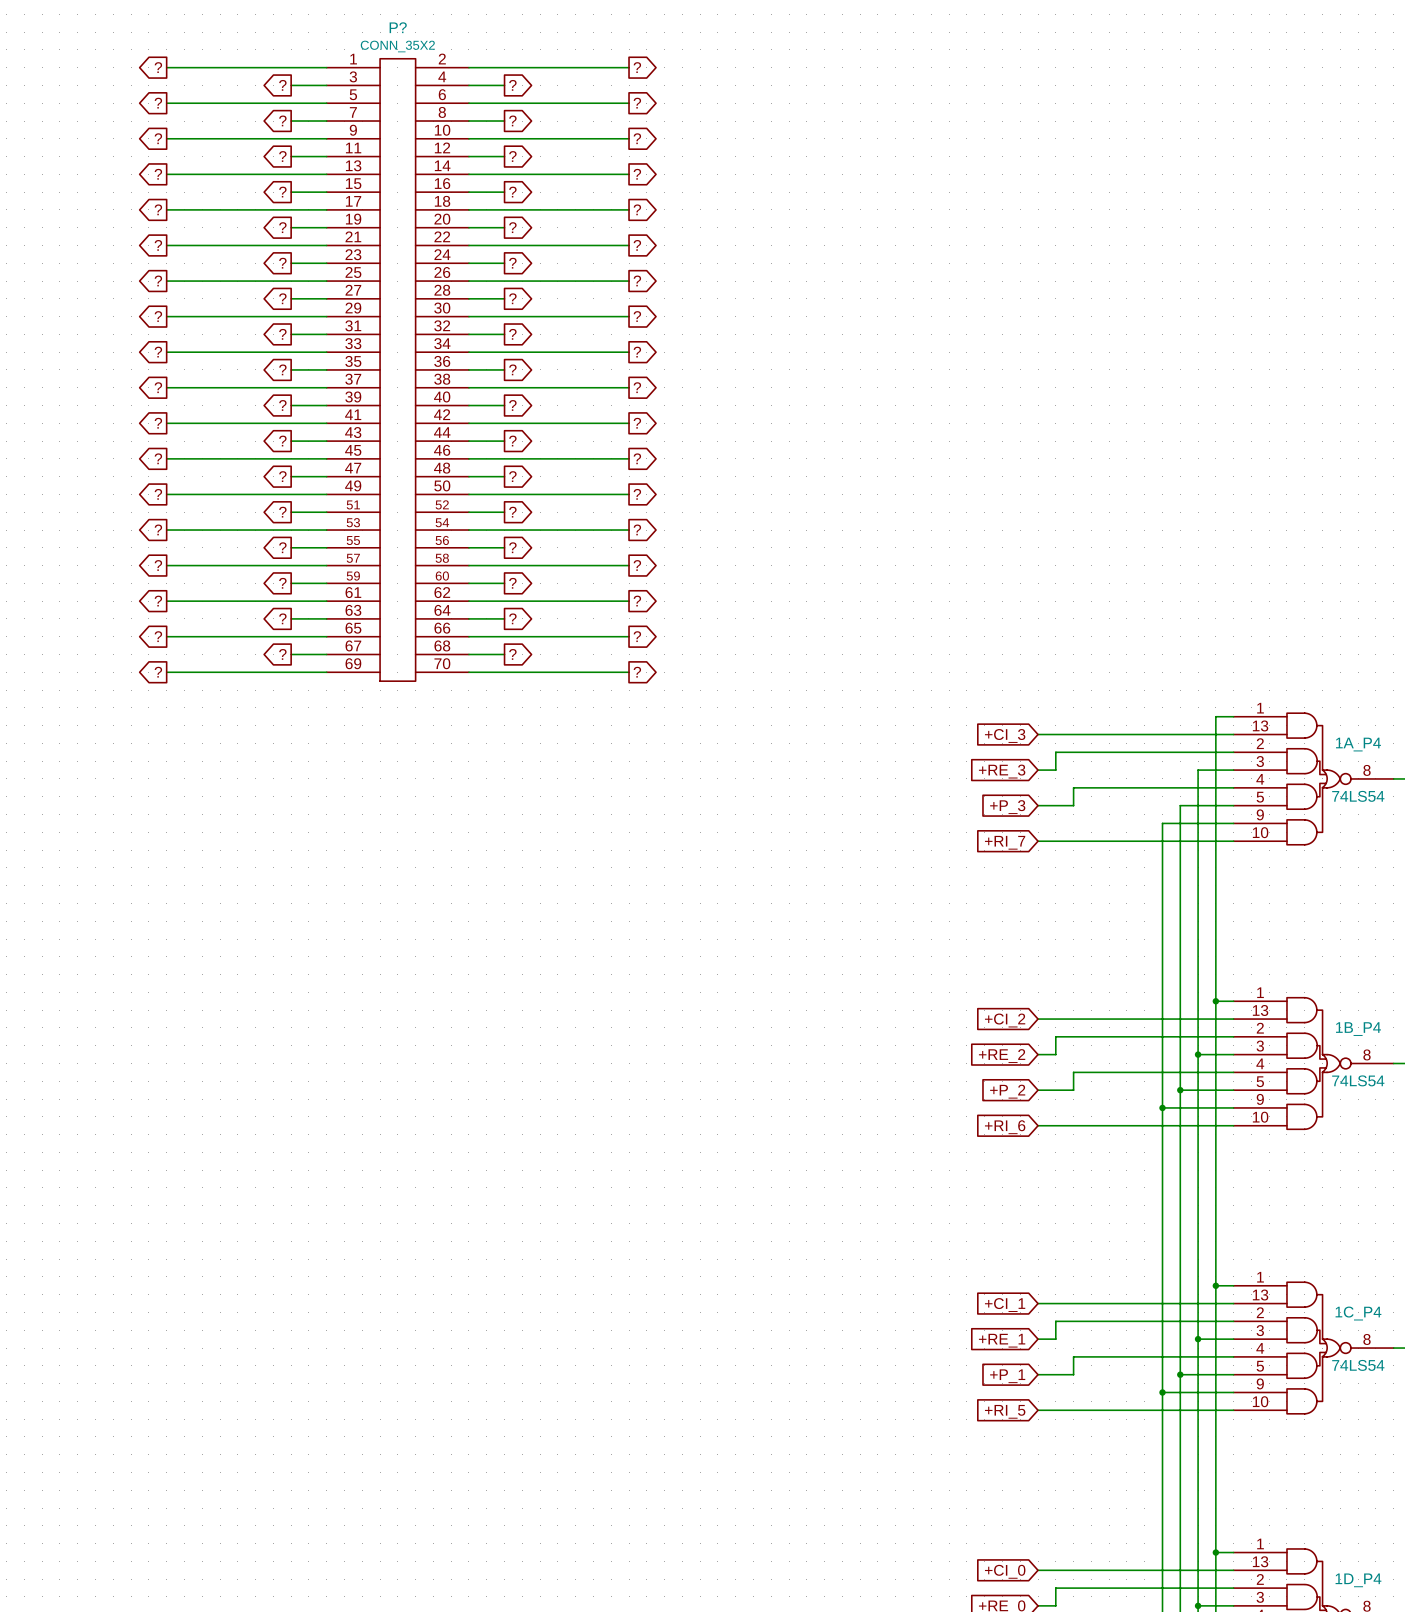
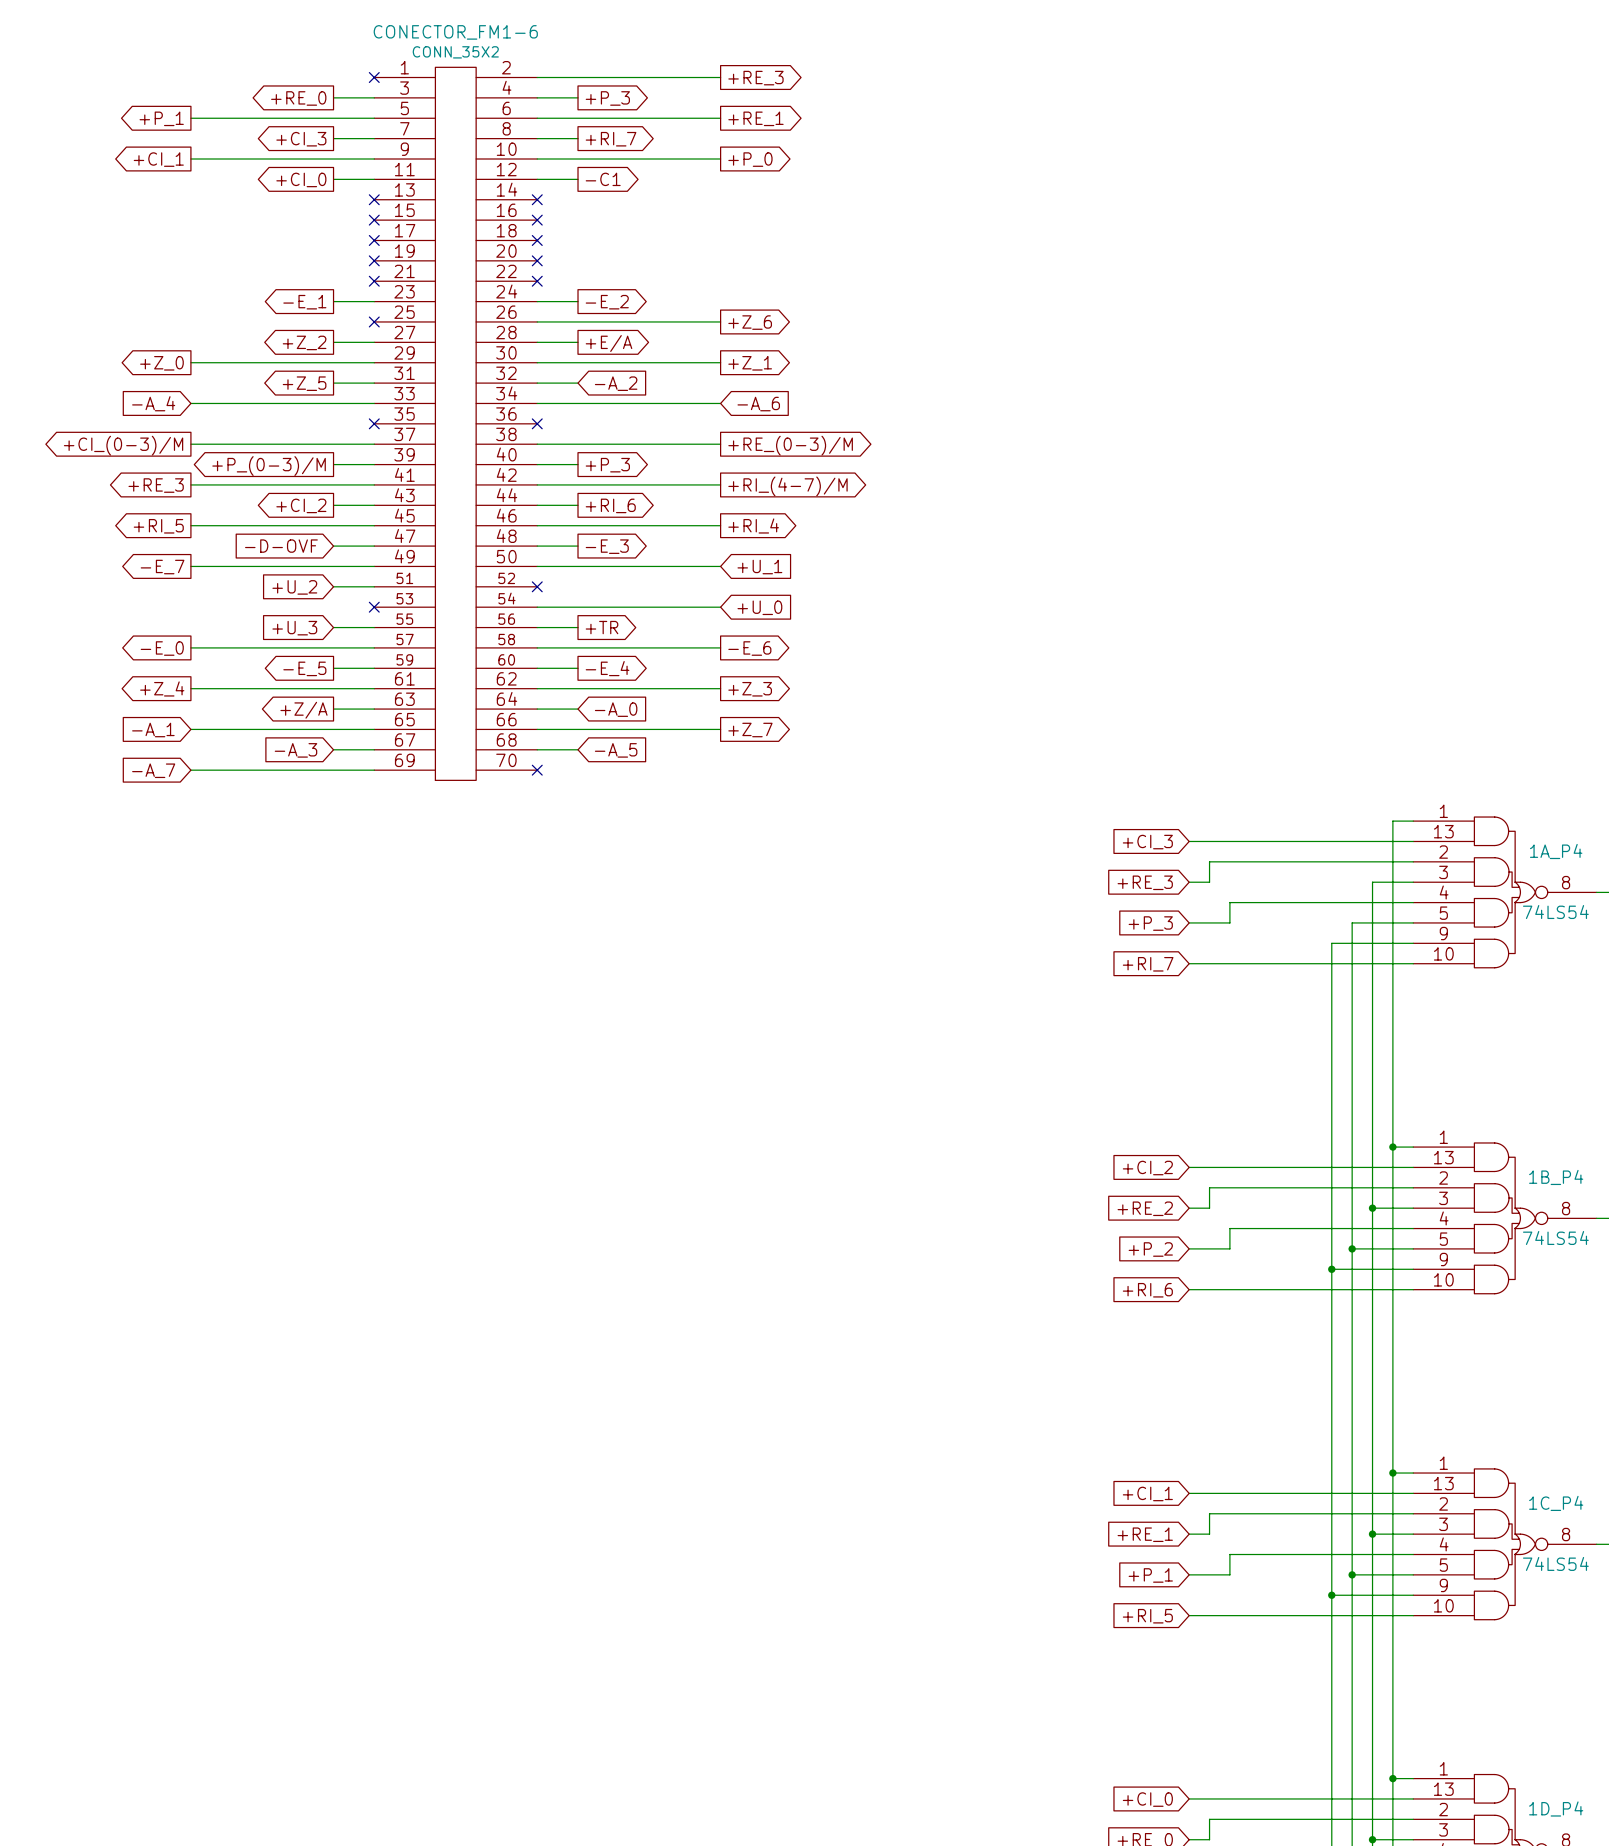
P? name: P? (398, 27) -> CONECTOR_FM1-6 (455, 32)
global label: ? (158, 67) -> none
wire: (166, 67) (326, 67) -> none
no-connect mark: none -> (374, 77)
global label: ? (637, 67) -> +RE_3 (755, 78)
global label: ? (282, 85) -> +RE_0 (298, 98)
global label: ? (512, 85) -> +P_3 (607, 98)
global label: ? (158, 103) -> +P_1 (161, 118)
global label: ? (637, 103) -> +RE_1 (755, 118)
global label: ? (282, 120) -> +CI_3 (301, 139)
global label: ? (512, 120) -> +RI_7 (611, 139)
global label: ? (158, 138) -> +CI_1 (158, 159)
global label: ? (637, 138) -> +P_0 (750, 159)
global label: ? (282, 156) -> +CI_0 (301, 179)
global label: ? (512, 156) -> -C1 (603, 179)
global label: ? (158, 174) -> none
wire: (166, 174) (326, 174) -> none
no-connect mark: none -> (374, 199)
wire: (468, 174) (629, 174) -> none
no-connect mark: none -> (537, 199)
global label: ? (637, 174) -> none
global label: ? (282, 192) -> none
wire: (291, 192) (326, 192) -> none
no-connect mark: none -> (374, 220)
wire: (468, 192) (504, 192) -> none
no-connect mark: none -> (537, 220)
global label: ? (512, 192) -> none
global label: ? (158, 209) -> none
wire: (166, 209) (326, 209) -> none
no-connect mark: none -> (374, 240)
wire: (468, 209) (629, 209) -> none
no-connect mark: none -> (537, 240)
global label: ? (637, 209) -> none
global label: ? (282, 227) -> none
wire: (291, 227) (326, 227) -> none
no-connect mark: none -> (374, 260)
wire: (468, 227) (504, 227) -> none
no-connect mark: none -> (537, 260)
global label: ? (512, 227) -> none
global label: ? (158, 245) -> none
wire: (166, 245) (326, 245) -> none
no-connect mark: none -> (374, 281)
wire: (468, 245) (629, 245) -> none
no-connect mark: none -> (537, 281)
global label: ? (637, 245) -> none
global label: ? (282, 263) -> -E_1 (304, 302)
global label: ? (512, 263) -> -E_2 (607, 302)
global label: ? (158, 280) -> none
global label: ? (637, 280) -> +Z_6 (750, 322)
wire: (166, 281) (326, 281) -> none
no-connect mark: none -> (374, 321)
global label: ? (282, 298) -> +Z_2 (304, 342)
global label: ? (512, 298) -> +E/A (609, 343)
global label: ? (158, 316) -> +Z_0 (161, 363)
global label: ? (637, 316) -> +Z_1 (750, 363)
global label: ? (282, 334) -> +Z_5 (304, 383)
global label shape: output (512, 334) -> input (616, 383)
global label: ? (512, 334) -> -A_2 (616, 383)
global label shape: output (158, 352) -> input (153, 403)
global label: ? (158, 352) -> -A_4 (153, 403)
global label shape: output (637, 352) -> input (758, 404)
global label: ? (637, 352) -> -A_6 (758, 404)
global label: ? (282, 369) -> none
wire: (291, 369) (326, 369) -> none
no-connect mark: none -> (374, 423)
wire: (468, 369) (504, 369) -> none
no-connect mark: none -> (537, 423)
global label: ? (512, 369) -> none
global label: ? (158, 387) -> +CI_(0-3)/M (123, 445)
global label: ? (637, 387) -> +RE_(0-3)/M (790, 445)
global label: ? (282, 405) -> +P_(0-3)/M (269, 466)
global label: ? (512, 405) -> +P_3 (607, 465)
global label: ? (158, 423) -> +RE_3 (156, 485)
global label: ? (637, 423) -> +RI_(4-7)/M (787, 486)
global label: ? (282, 441) -> +CI_2 (301, 505)
global label: ? (512, 441) -> +RI_6 (610, 505)
global label: ? (158, 458) -> +RI_5 (158, 526)
global label: ? (637, 458) -> +RI_4 (753, 525)
global label shape: output (282, 476) -> input (281, 546)
global label: ? (282, 476) -> -D-OVF (281, 546)
global label: ? (512, 476) -> -E_3 (607, 546)
global label: ? (158, 494) -> -E_7 (162, 567)
global label shape: output (637, 494) -> input (759, 567)
global label: ? (637, 494) -> +U_1 (759, 567)
global label shape: output (282, 512) -> input (294, 587)
global label: ? (282, 512) -> +U_2 (294, 587)
wire: (468, 512) (504, 512) -> none
no-connect mark: none -> (537, 586)
global label: ? (512, 512) -> none
global label: ? (158, 529) -> none
global label shape: output (637, 529) -> input (759, 607)
global label: ? (637, 529) -> +U_0 (759, 607)
wire: (166, 530) (326, 530) -> none
no-connect mark: none -> (374, 607)
global label shape: output (282, 547) -> input (294, 628)
global label: ? (282, 547) -> +U_3 (294, 628)
global label: ? (512, 547) -> +TR (602, 627)
global label: ? (158, 565) -> -E_0 (162, 648)
global label: ? (637, 565) -> -E_6 (749, 648)
global label: ? (282, 583) -> -E_5 (304, 668)
global label: ? (512, 583) -> -E_4 (607, 668)
global label: ? (158, 601) -> +Z_4 (162, 688)
global label: ? (637, 601) -> +Z_3 (750, 689)
global label: ? (282, 618) -> +Z/A (303, 710)
global label shape: output (512, 618) -> input (616, 709)
global label: ? (512, 618) -> -A_0 (616, 709)
global label shape: output (158, 636) -> input (153, 730)
global label: ? (158, 636) -> -A_1 (153, 730)
global label: ? (637, 636) -> +Z_7 (750, 730)
global label shape: output (282, 654) -> input (295, 750)
global label: ? (282, 654) -> -A_3 (295, 750)
global label shape: output (512, 654) -> input (616, 750)
global label: ? (512, 654) -> -A_5 (616, 750)
global label shape: output (158, 672) -> input (153, 770)
global label: ? (158, 672) -> -A_7 (153, 770)
wire: (468, 672) (629, 672) -> none
no-connect mark: none -> (537, 770)
global label: ? (637, 672) -> none

